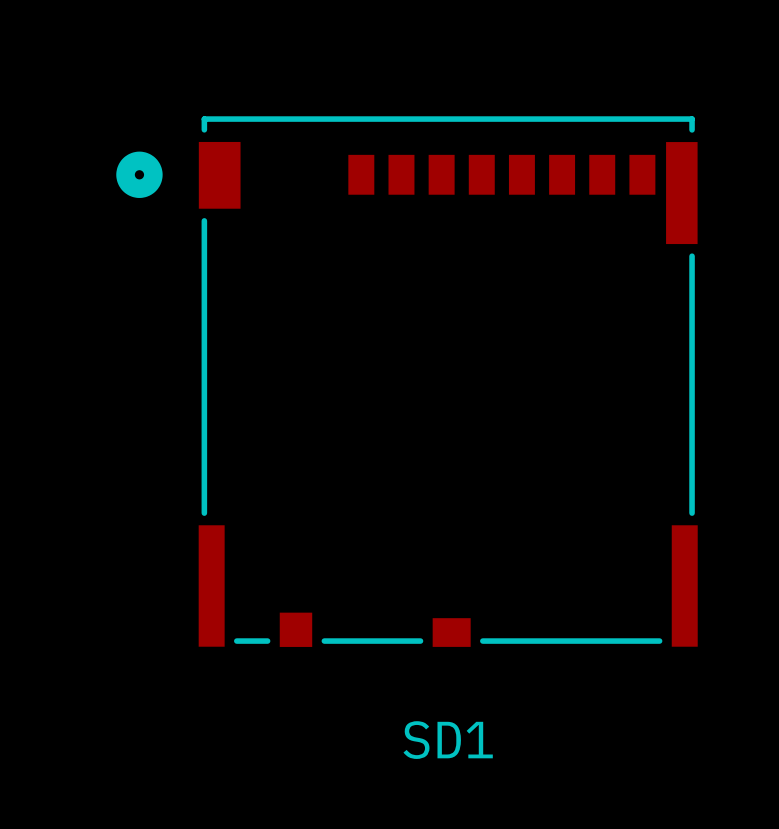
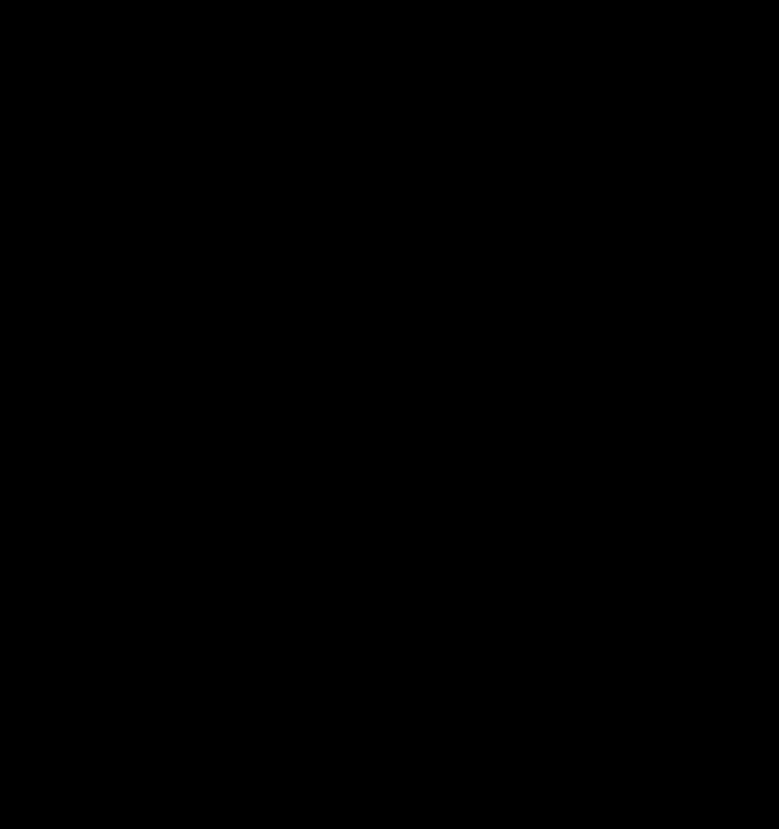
SD1: (406, 381) -> none

